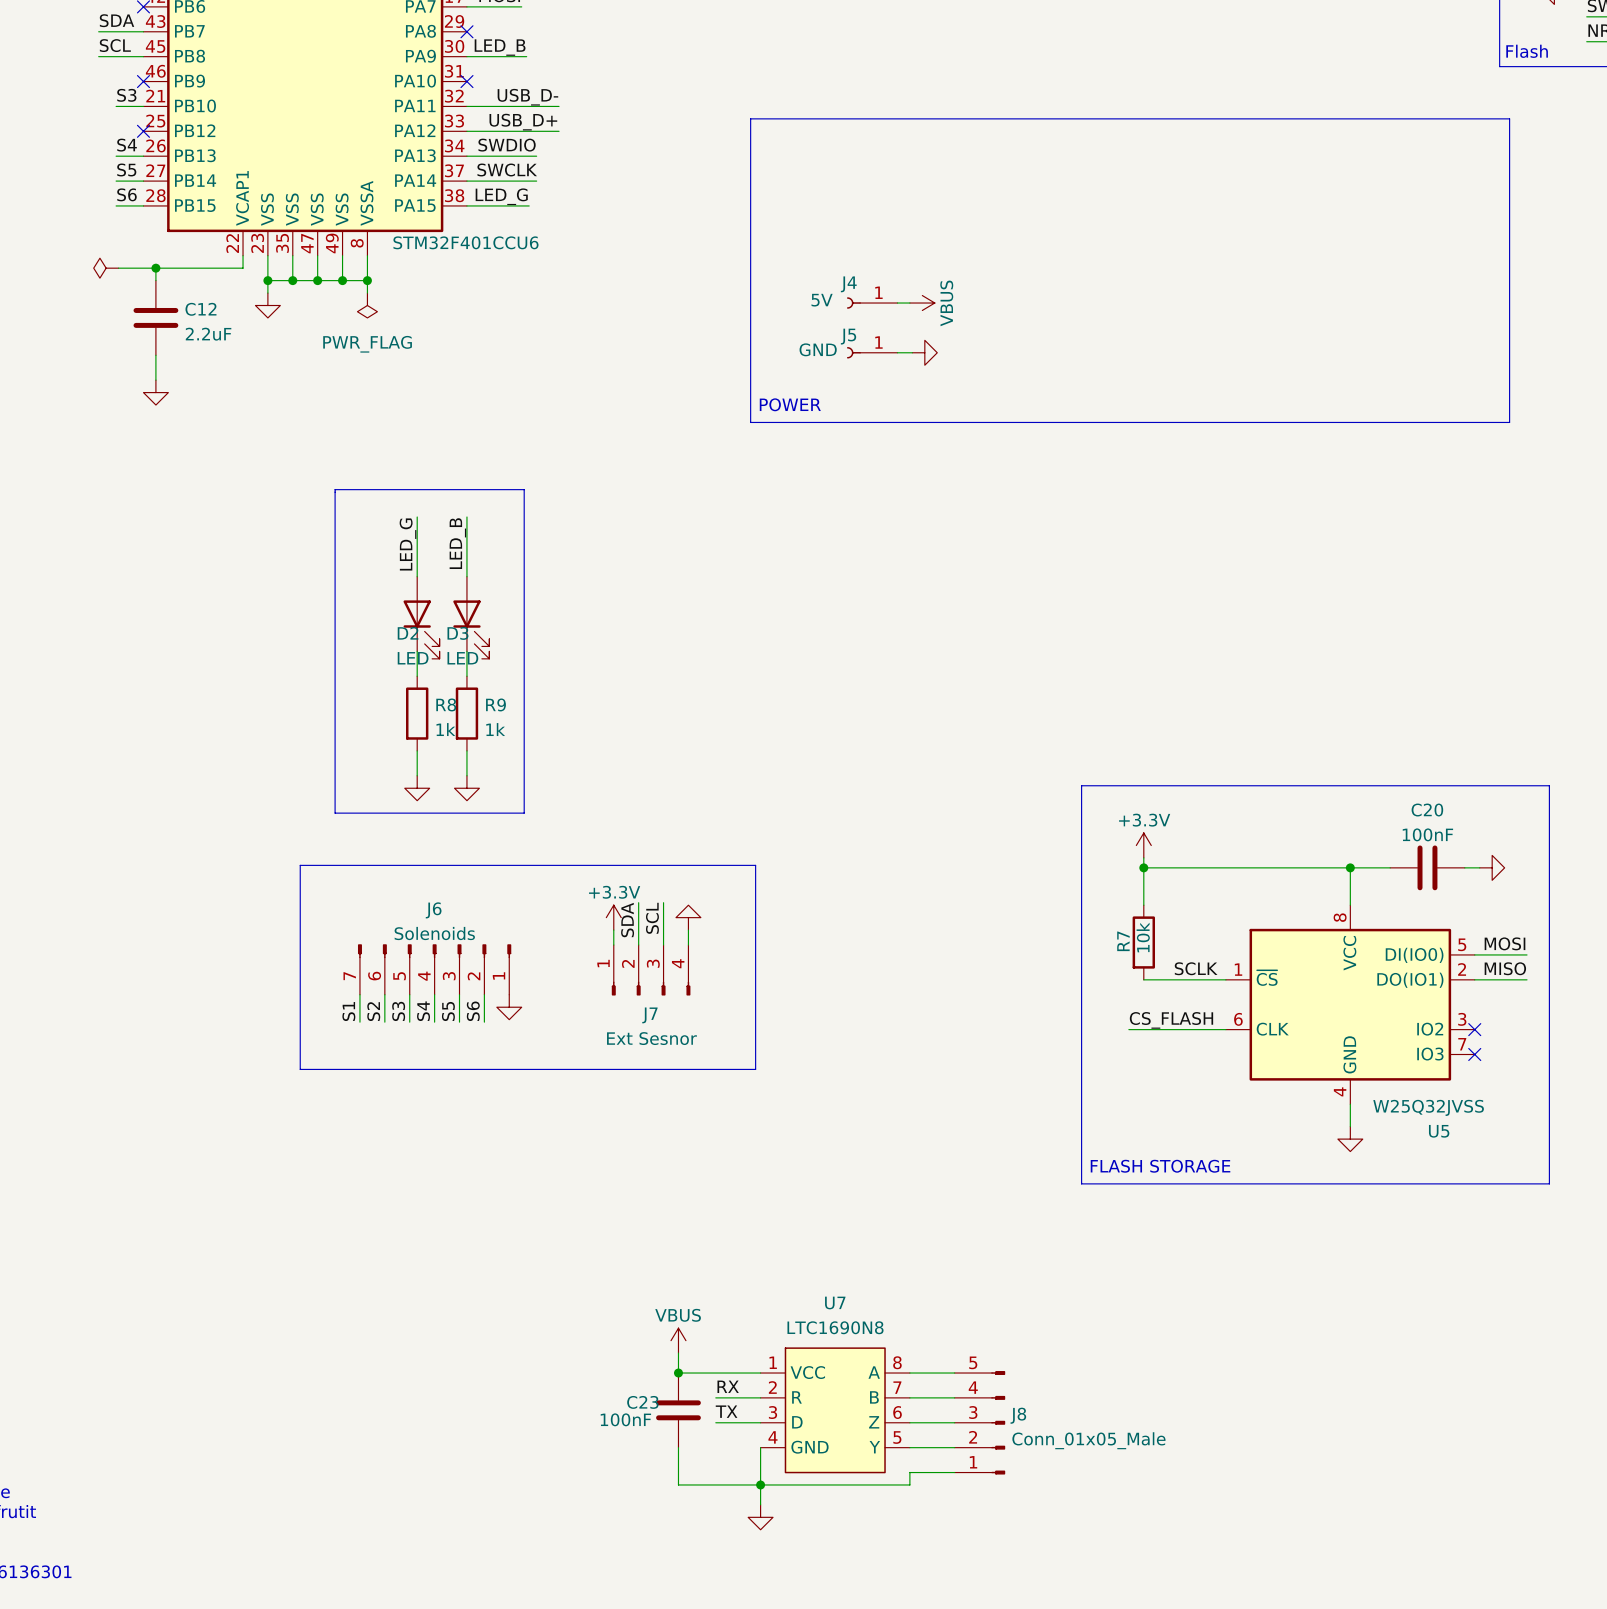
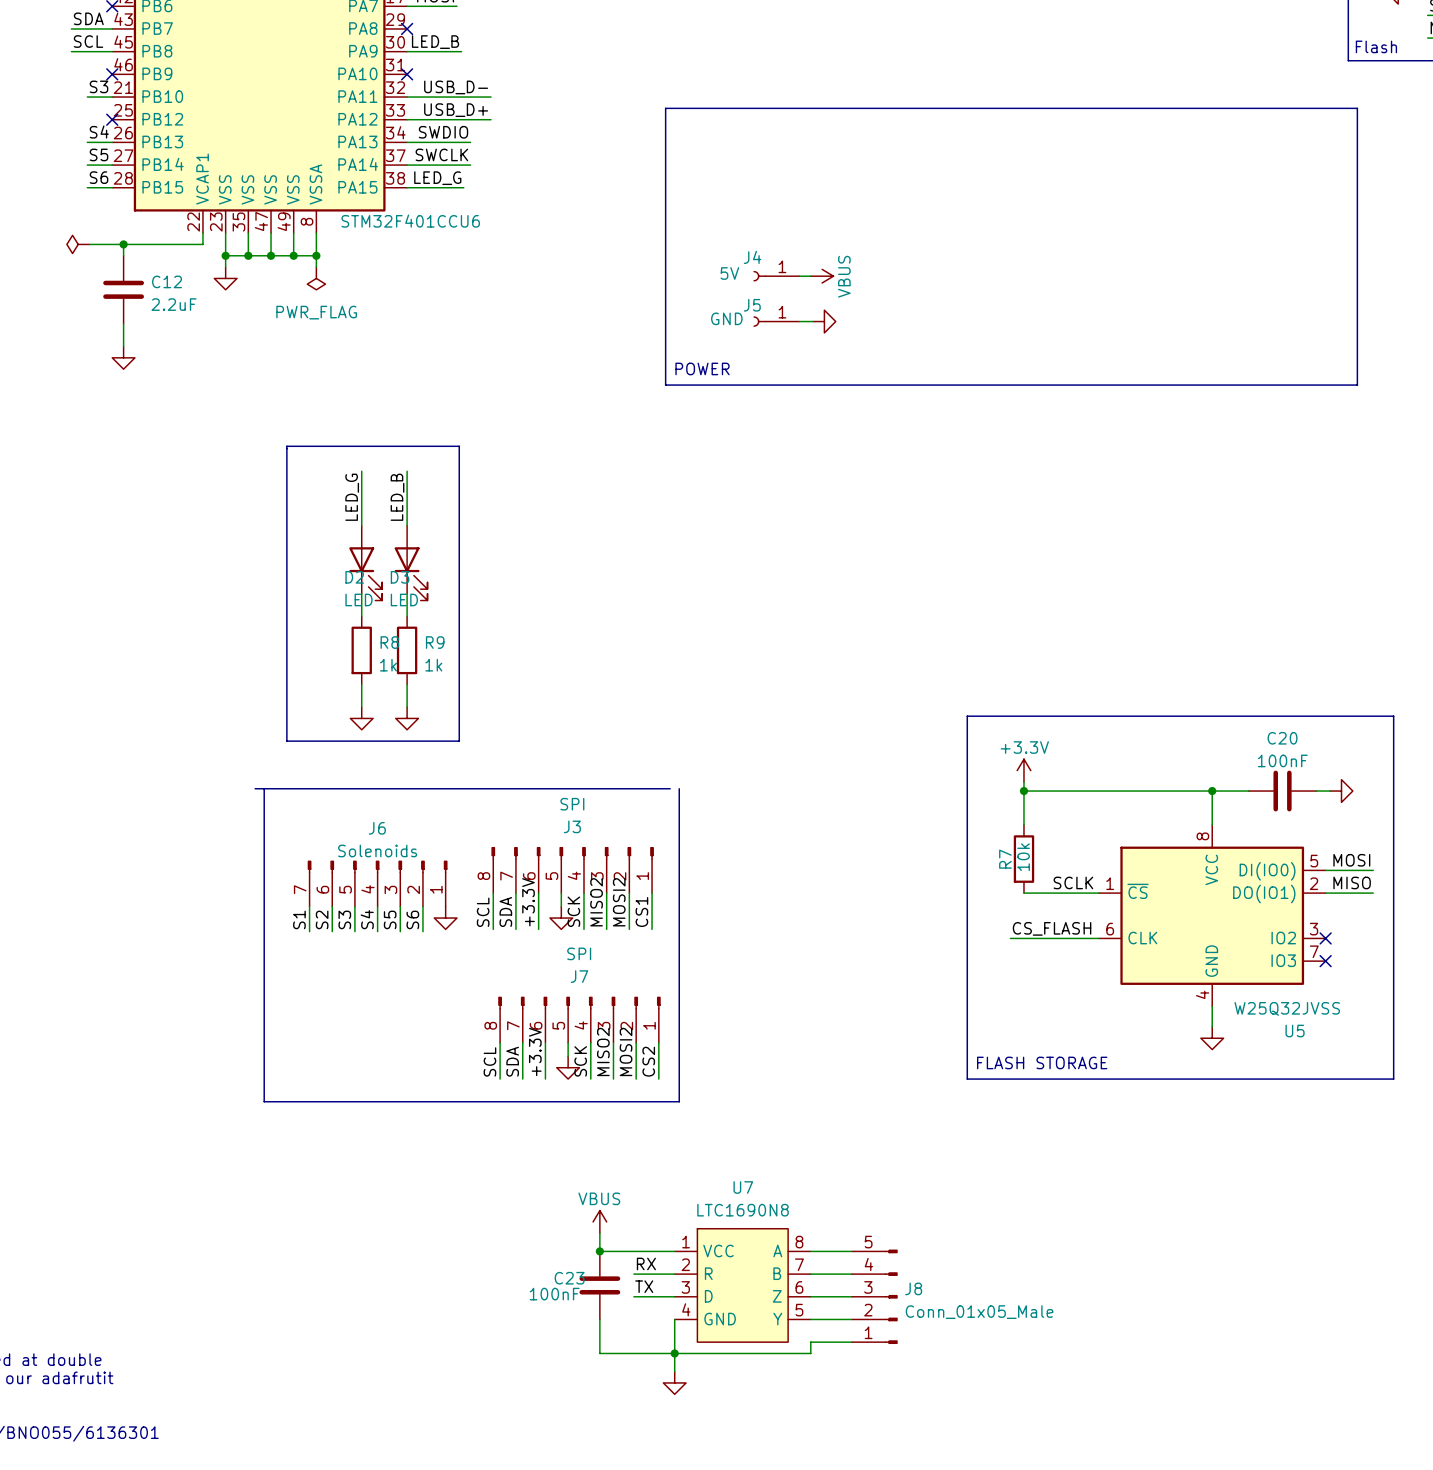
line: (300, 865) (300, 1069) (755, 1069) (755, 865) -> none
line: none -> (264, 788) (264, 1101) (679, 1101) (679, 788)
wire: (638, 902) (638, 945) -> none
wire: (663, 902) (663, 945) -> none
power symbol: +3.3V (613, 917) -> none
power symbol rotation: 0° (688, 917) -> 180° (561, 918)
power symbol position: (688, 917) -> (561, 918)
label: SCL (652, 918) -> none
label position: SDA (627, 920) -> SDA (505, 912)
wire: (613, 930) (613, 945) -> (561, 893) (561, 906)
wire: (688, 930) (688, 945) -> (568, 1042) (568, 1056)
J7 symbol: [611, 945, 691, 996] -> [498, 996, 661, 1043]
J3: none -> SPI (572, 870)
wire: none -> (493, 893) (493, 929)
wire: none -> (515, 893) (515, 929)
wire: none -> (538, 893) (538, 929)
wire: none -> (583, 893) (583, 929)
wire: none -> (606, 893) (606, 929)
wire: none -> (629, 893) (629, 929)
wire: none -> (652, 893) (652, 929)
label: none -> +3.3V (528, 902)
label: none -> MISO2 (596, 902)
label: none -> MOSI2 (619, 902)
label: none -> SCK (573, 911)
label: none -> SCL (483, 912)
label: none -> CS1 (641, 912)
J7 name position: J7 (649, 1015) -> J7 (579, 976)
J7 value: Ext Sesnor (651, 1038) -> SPI (579, 953)
wire: none -> (500, 1042) (500, 1079)
wire: none -> (522, 1042) (522, 1079)
wire: none -> (545, 1042) (545, 1079)
wire: none -> (590, 1042) (590, 1079)
wire: none -> (613, 1042) (613, 1079)
wire: none -> (636, 1042) (636, 1079)
wire: none -> (658, 1042) (658, 1079)
label: none -> +3.3V (535, 1051)
label: none -> MISO2 (603, 1051)
label: none -> MOSI2 (626, 1051)
label: none -> SDA (512, 1061)
label: none -> SCK (580, 1061)
label: none -> SCL (489, 1061)
label: none -> CS2 (648, 1061)
power symbol: none -> (568, 1067)

